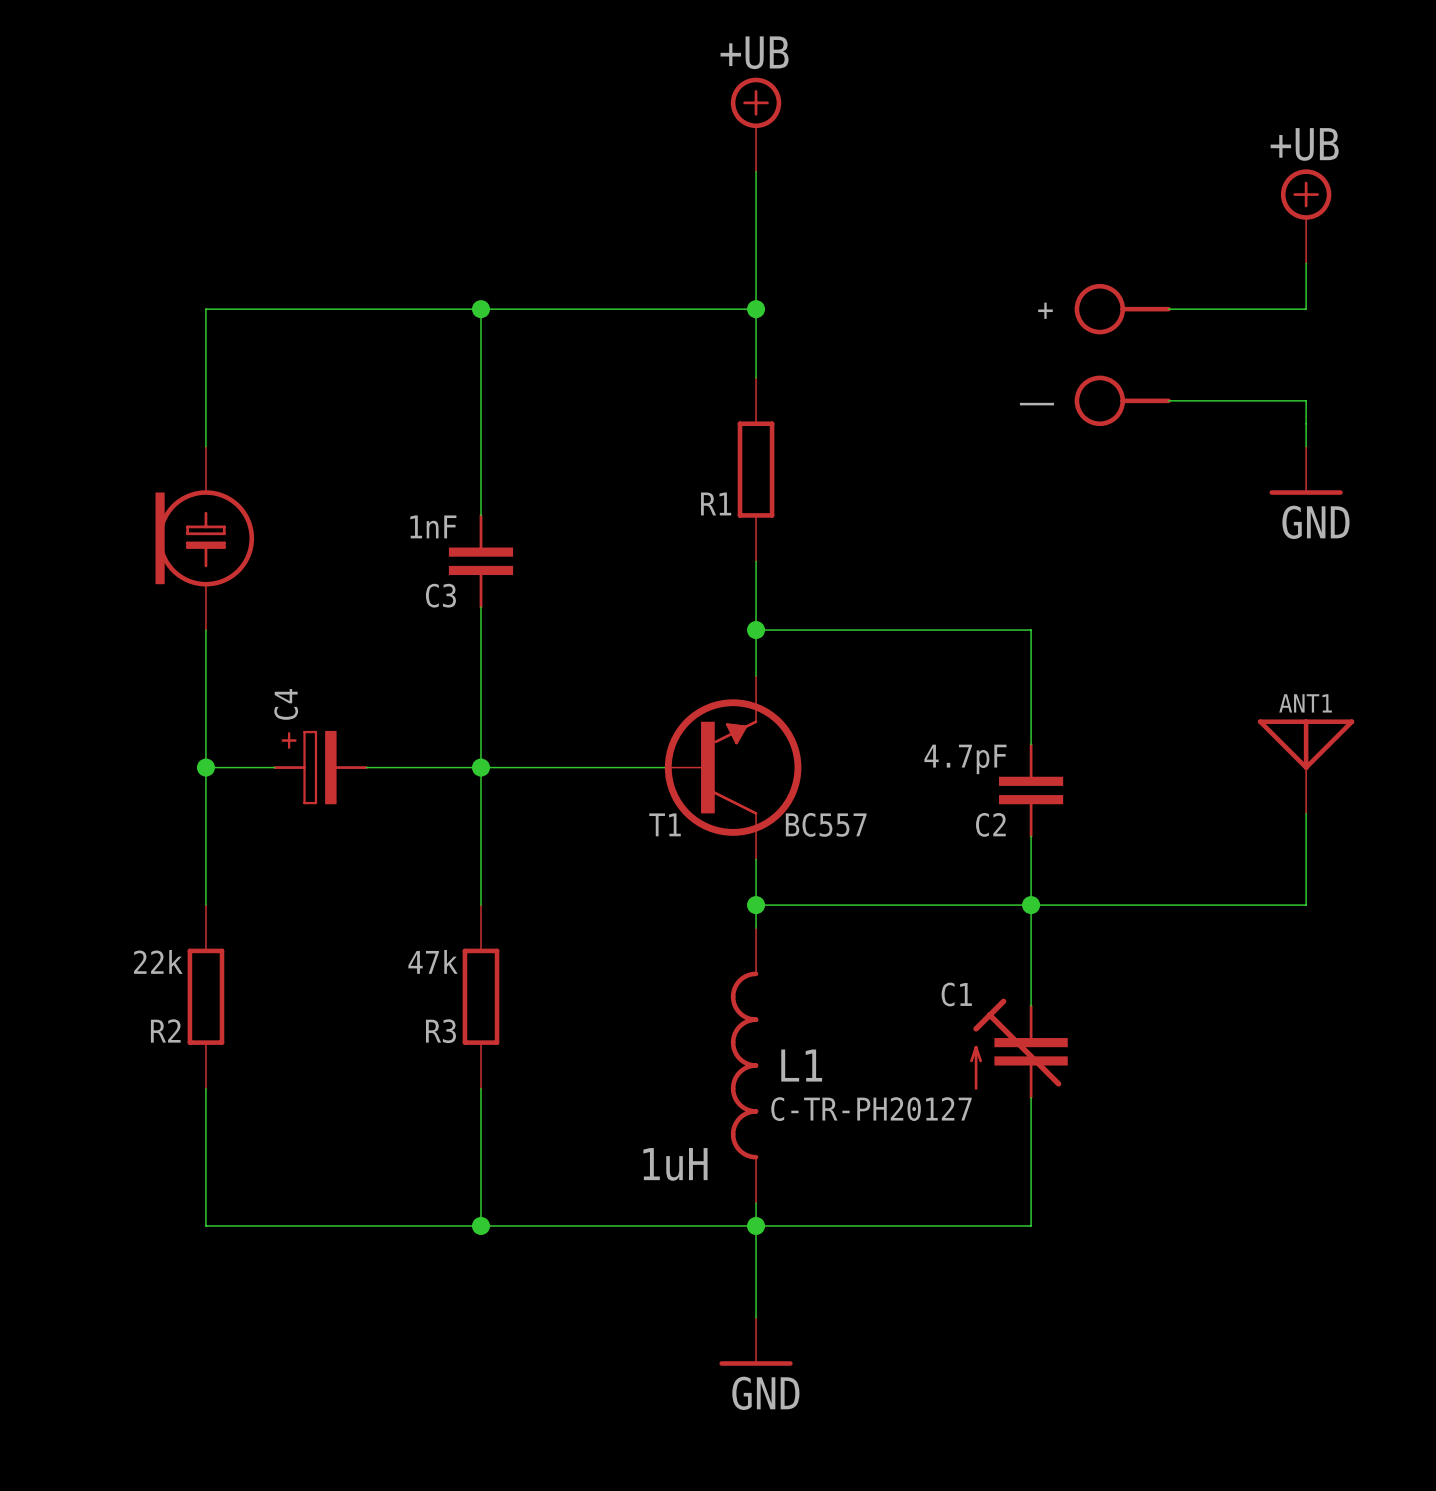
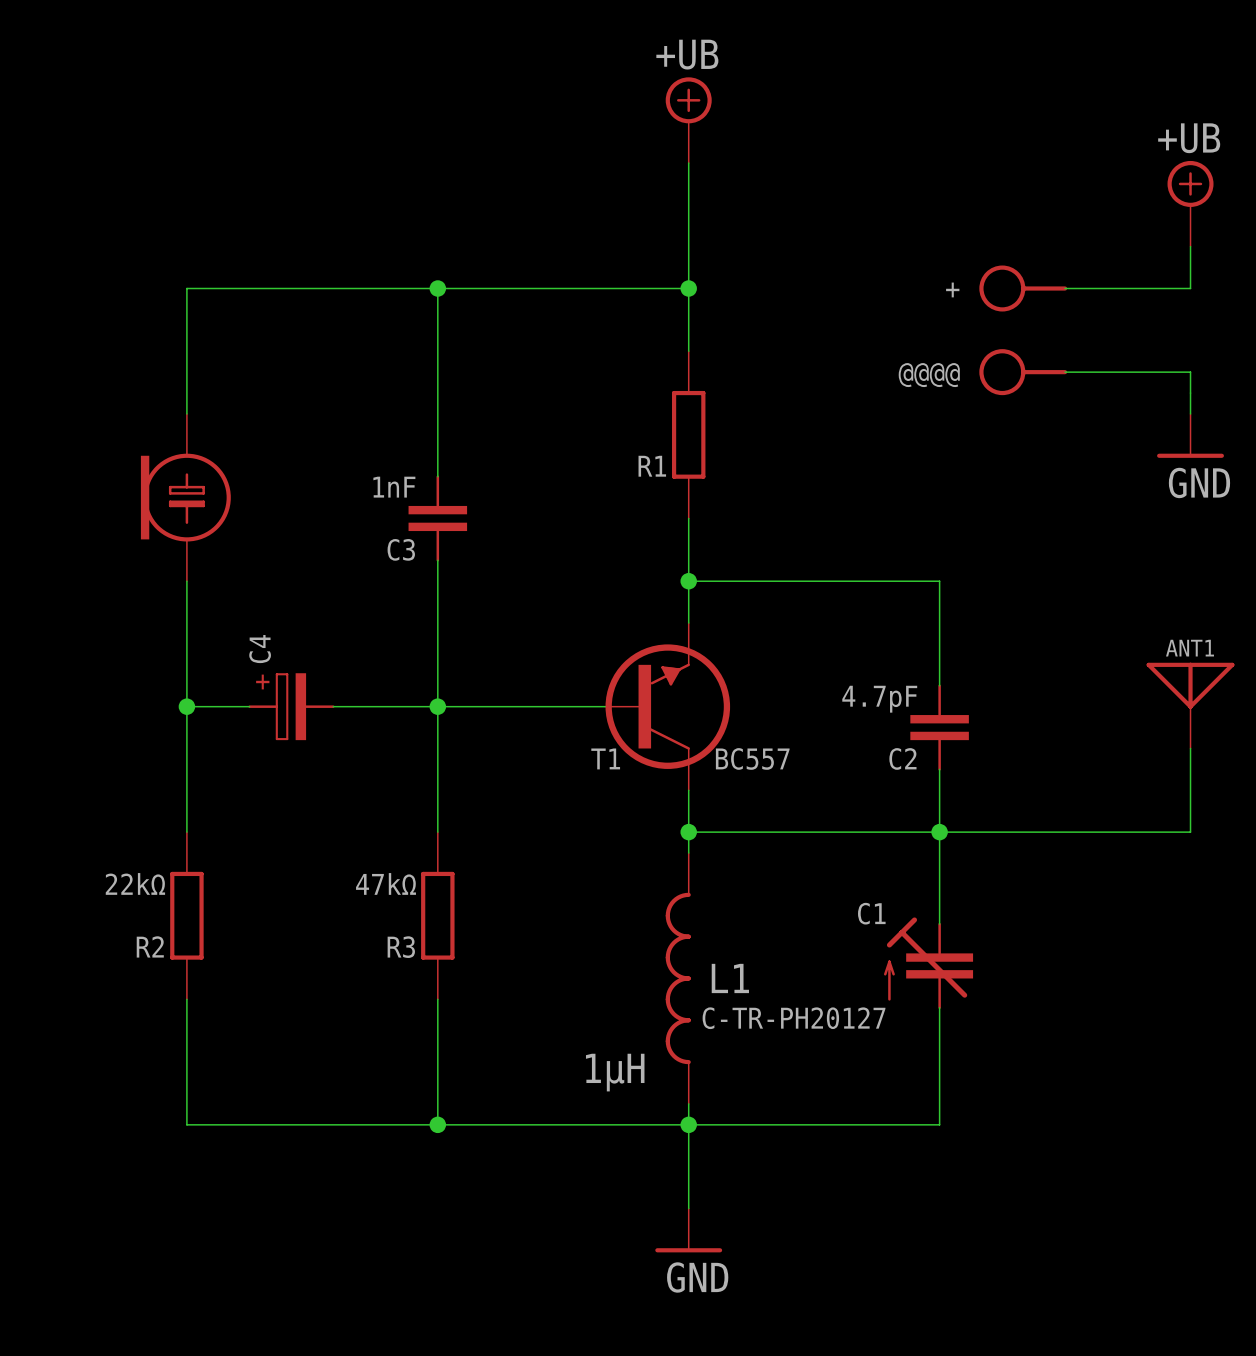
part name: ̶̶ (1036, 404) -> @@@@ (929, 375)
R2 value: 22k (158, 961) -> 22kΩ (135, 883)
R3 value: 47k (433, 961) -> 47kΩ (386, 883)
L1 value: 1uH (675, 1164) -> 1μH (615, 1072)

